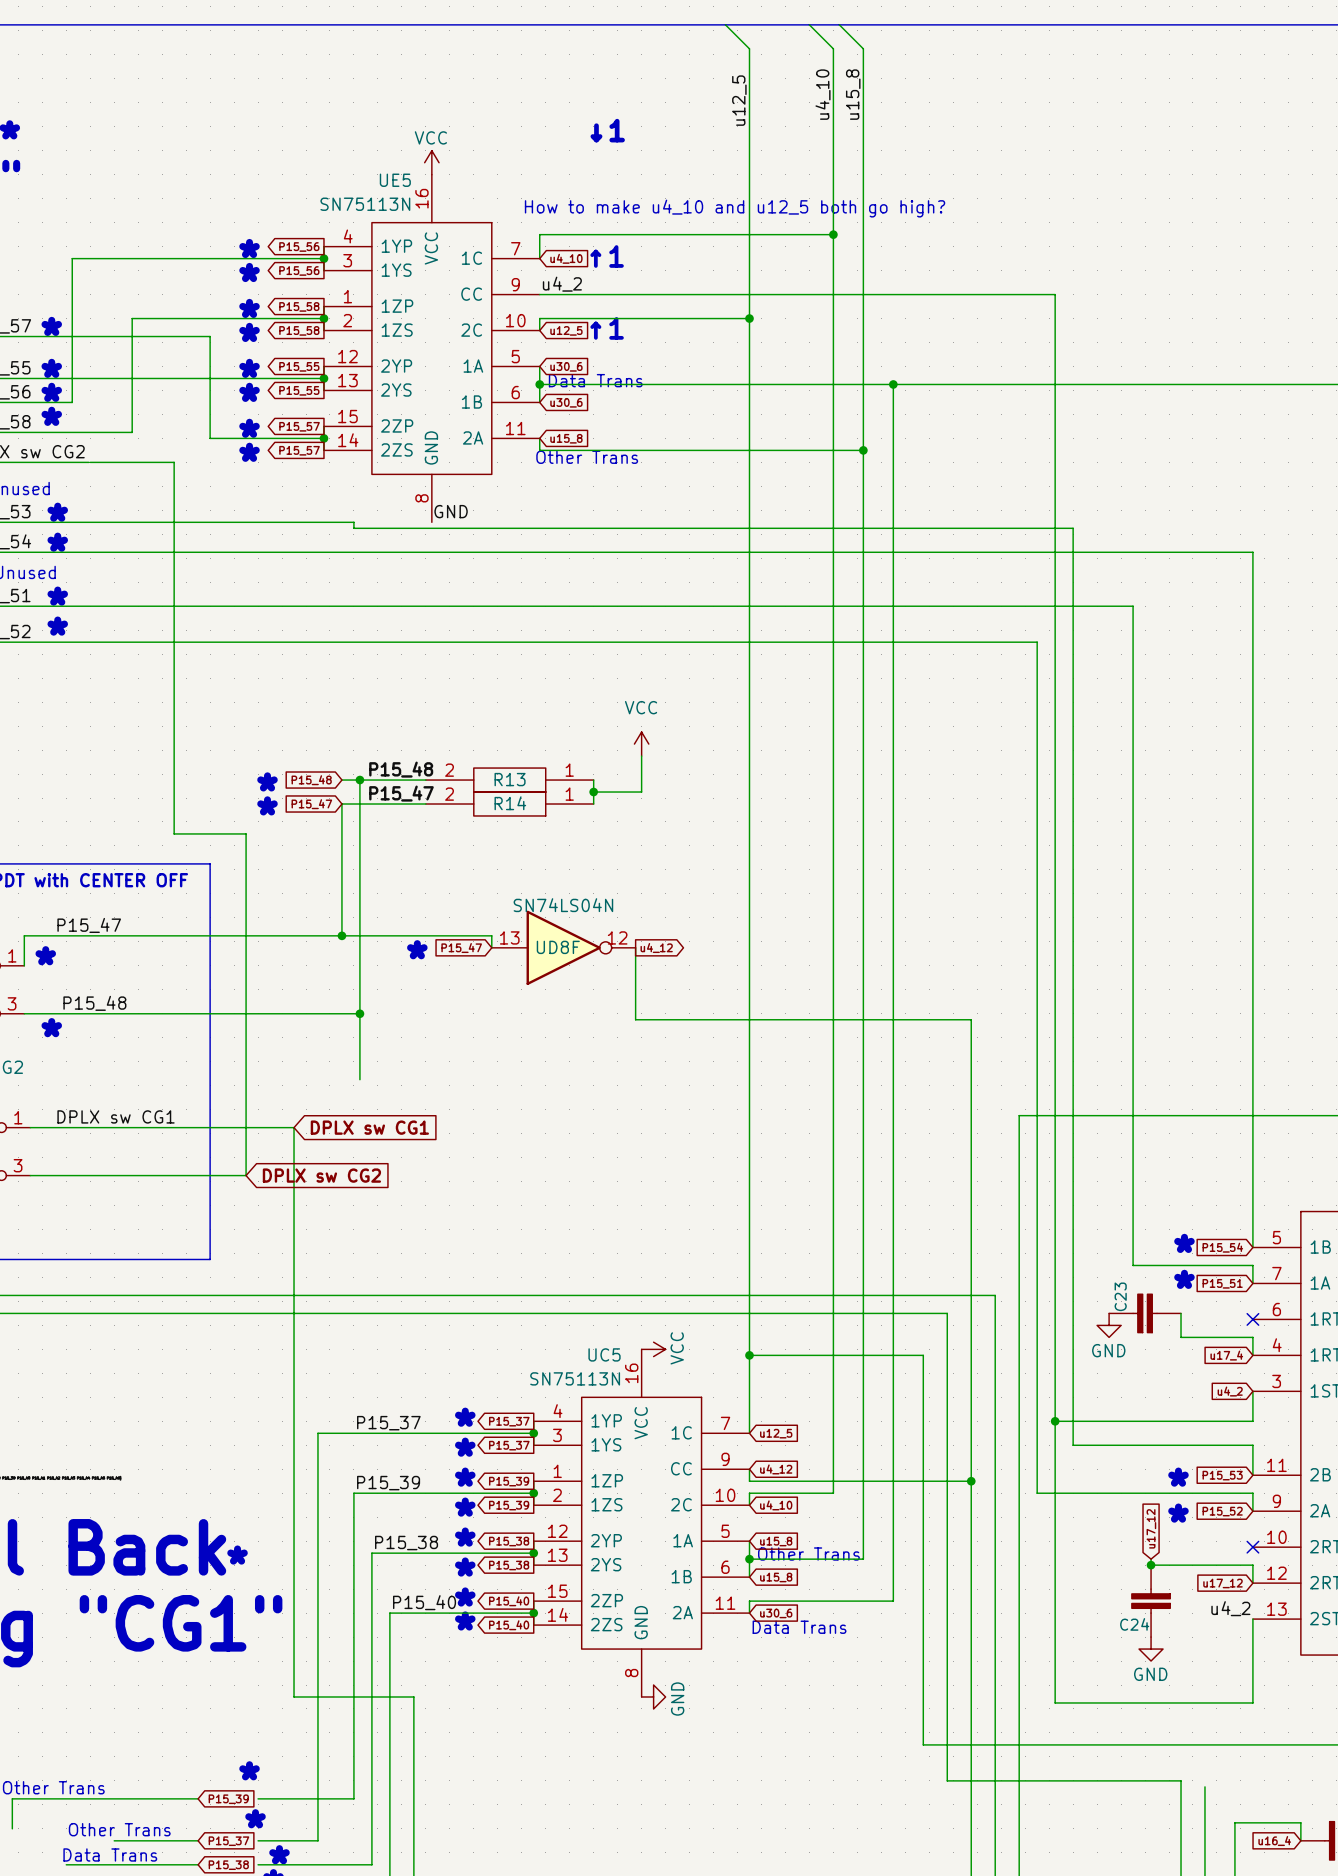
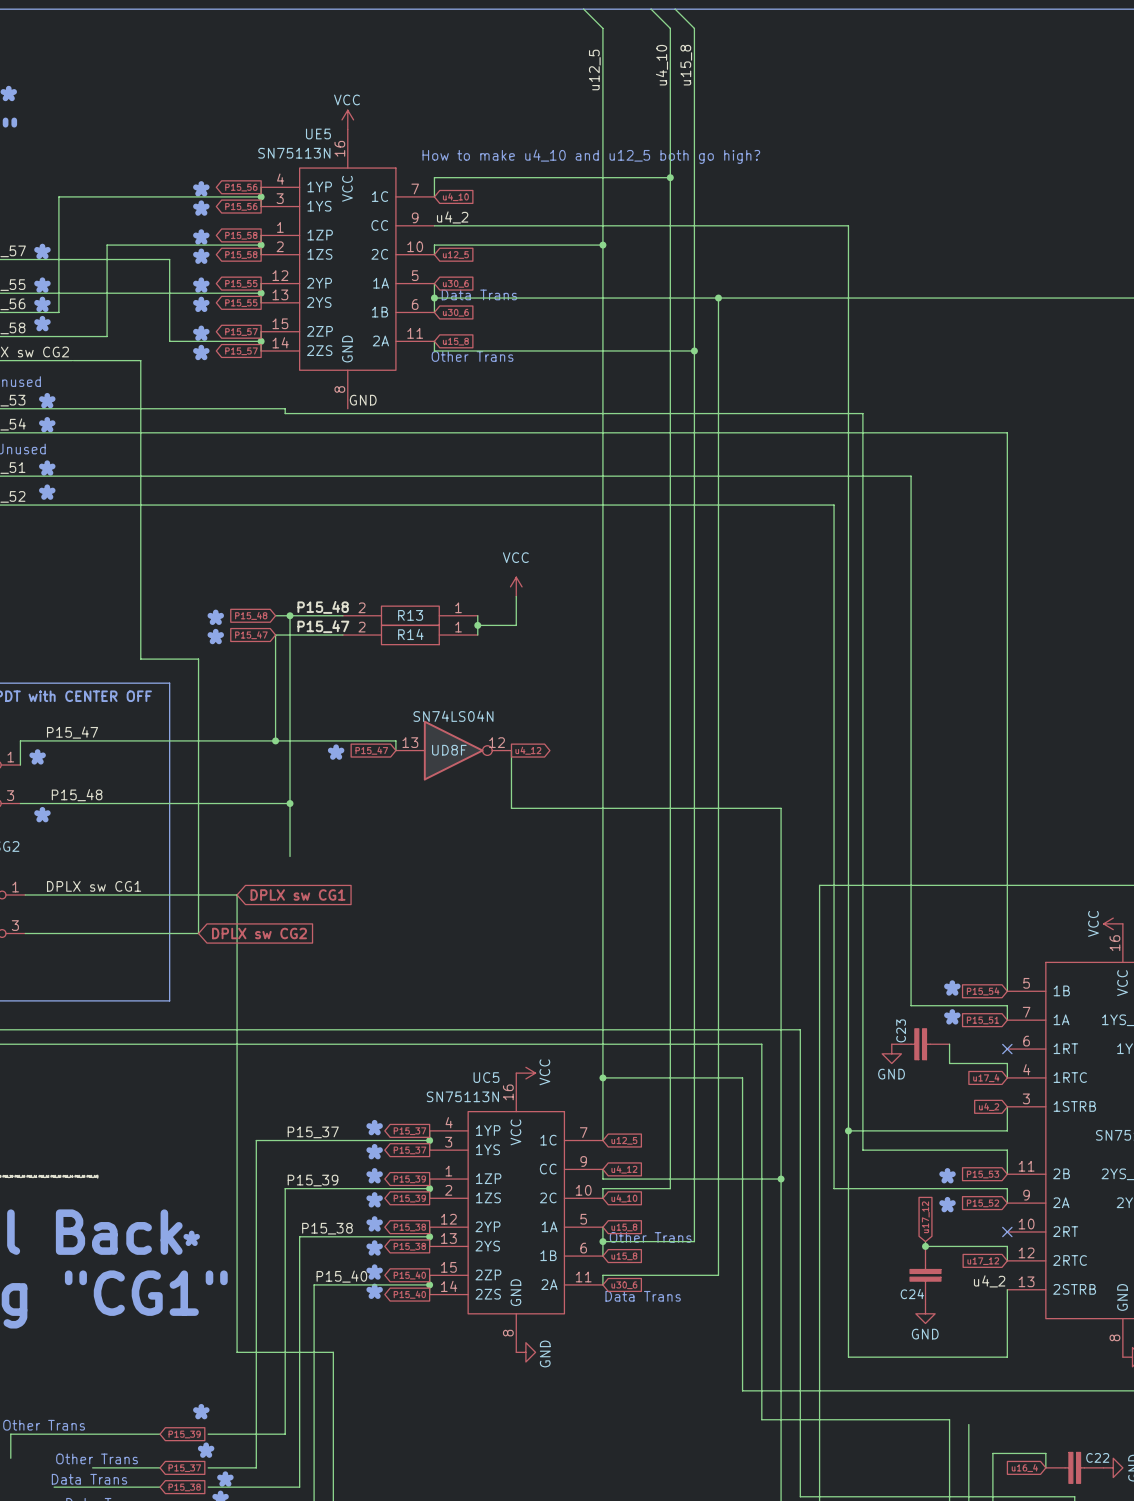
text: ↓1 (607, 130) -> none
text: ↑1 (607, 256) -> none
text: ↑1 (607, 328) -> none

